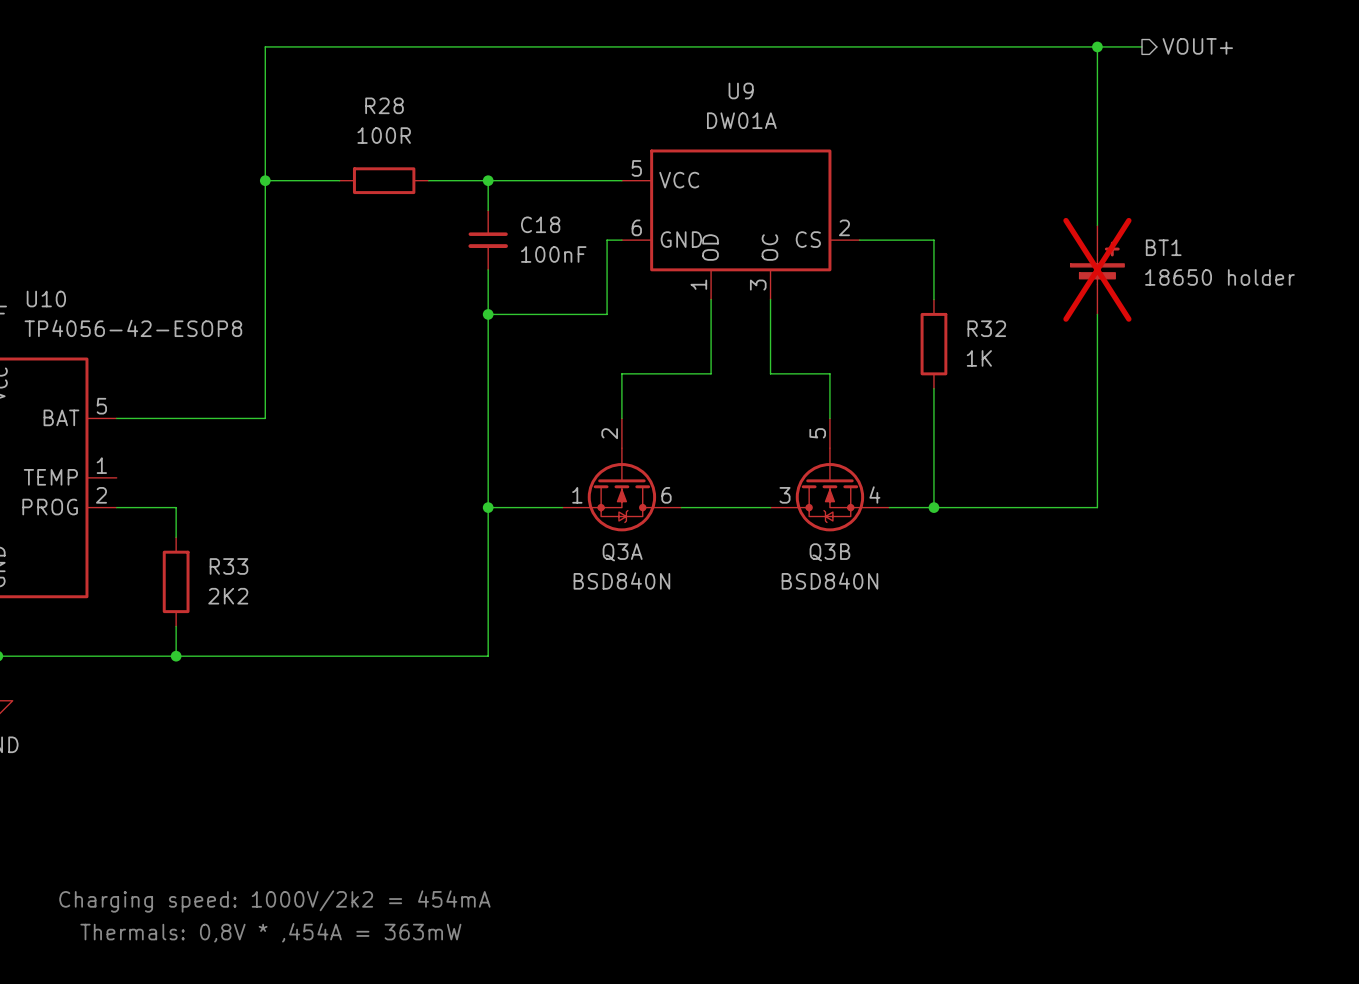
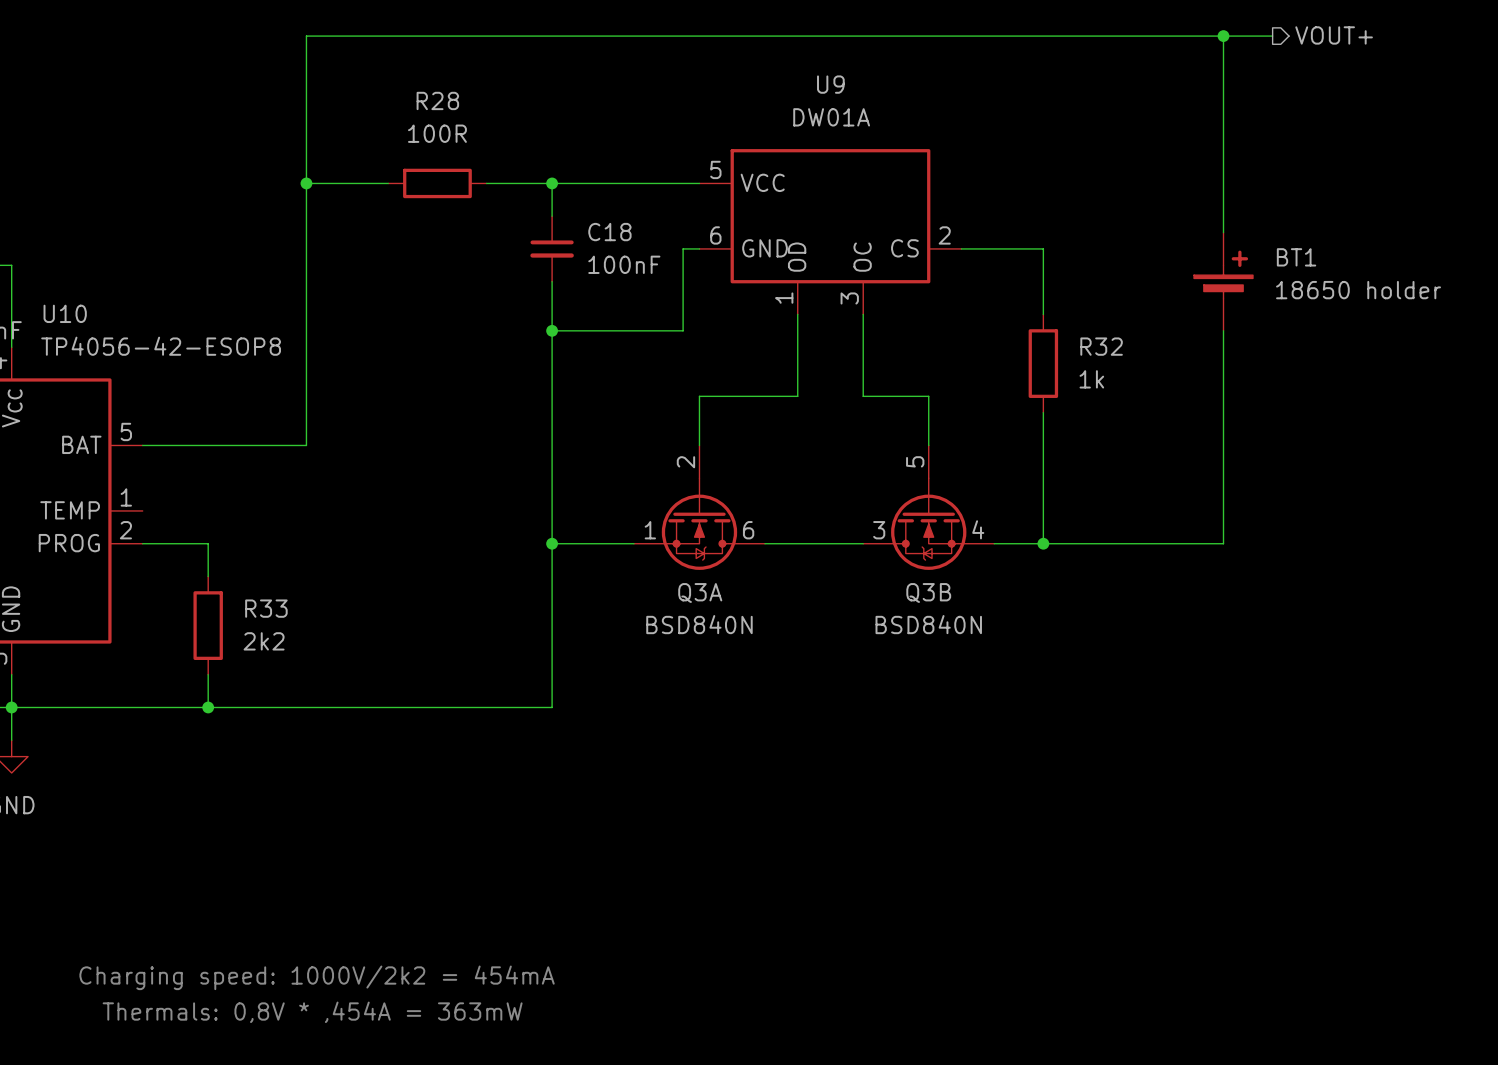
BT1 do-not-place cross: (1097, 269) -> none
R32 value: 1K (979, 358) -> 1k (1091, 379)
R33 value: 2K2 (228, 596) -> 2k2 (264, 641)

